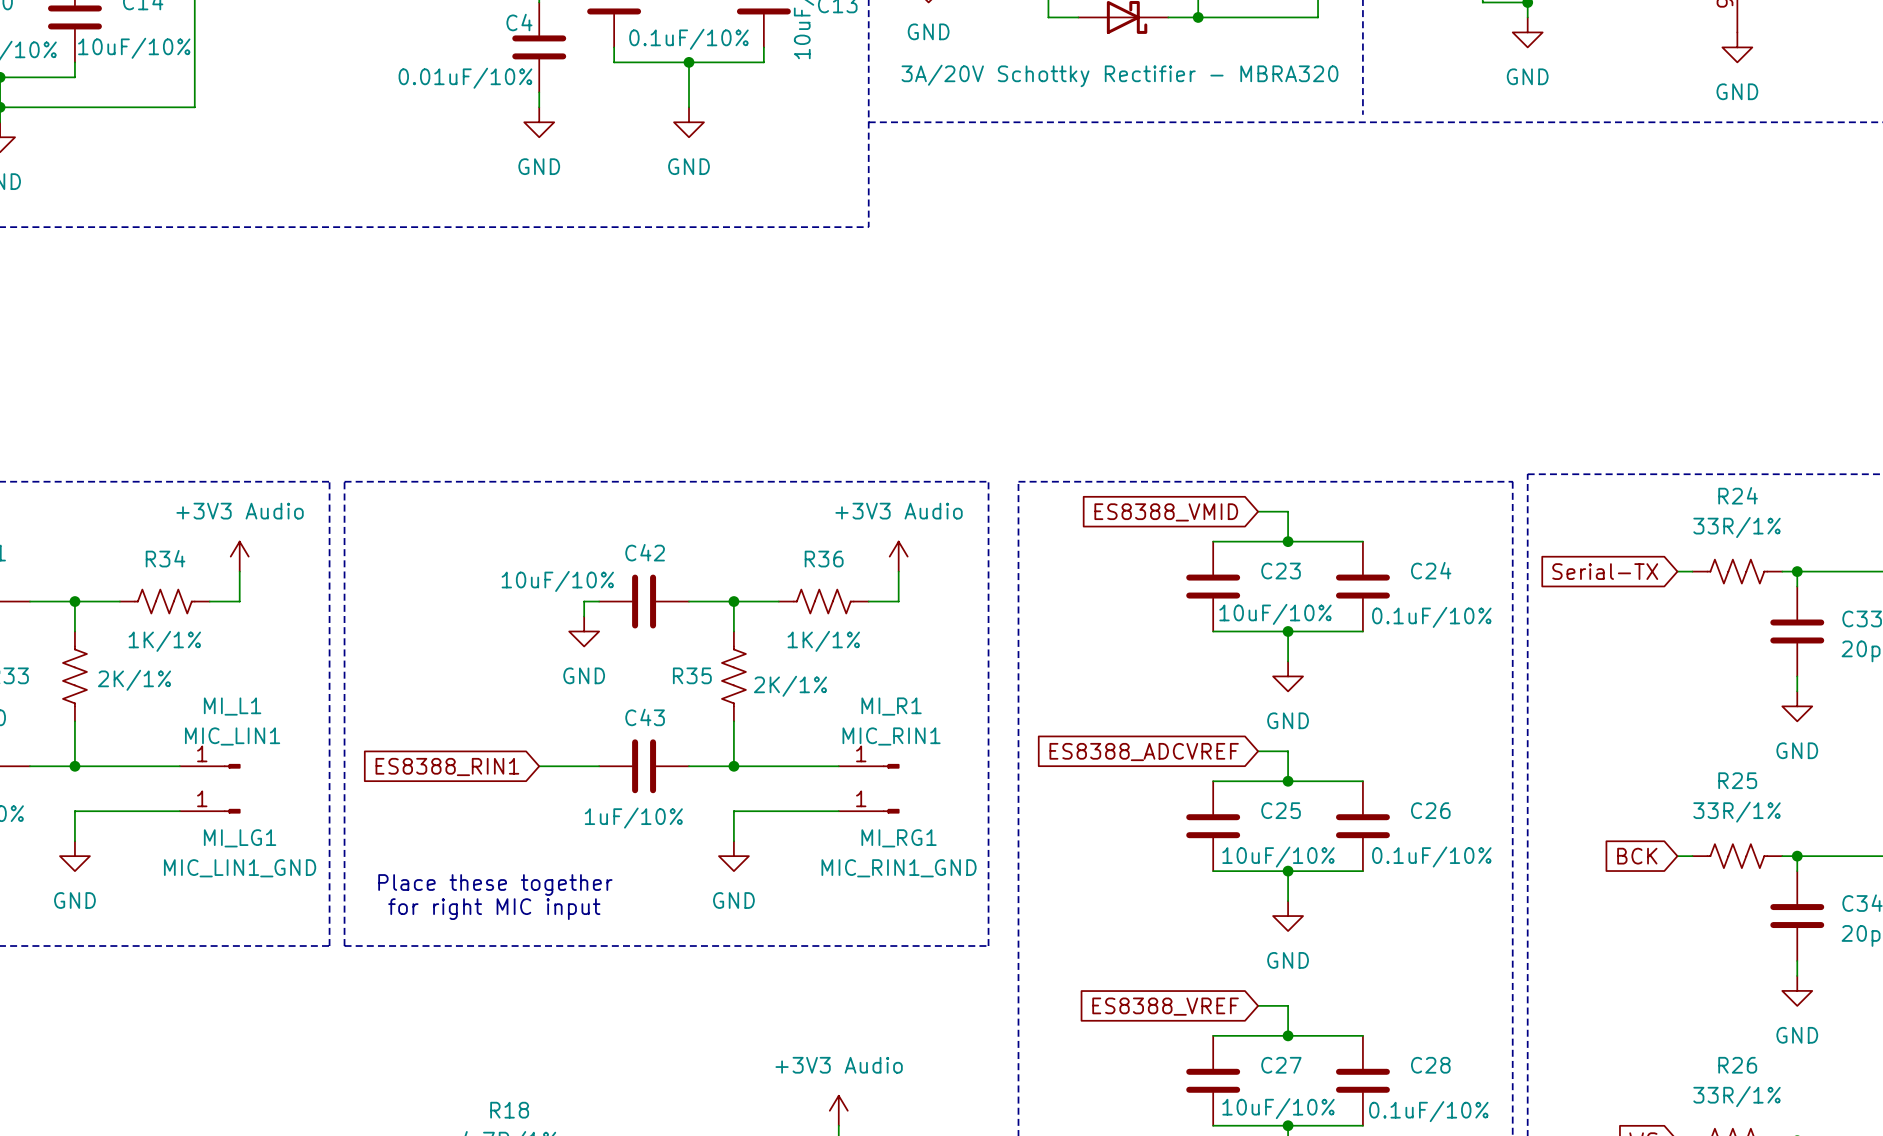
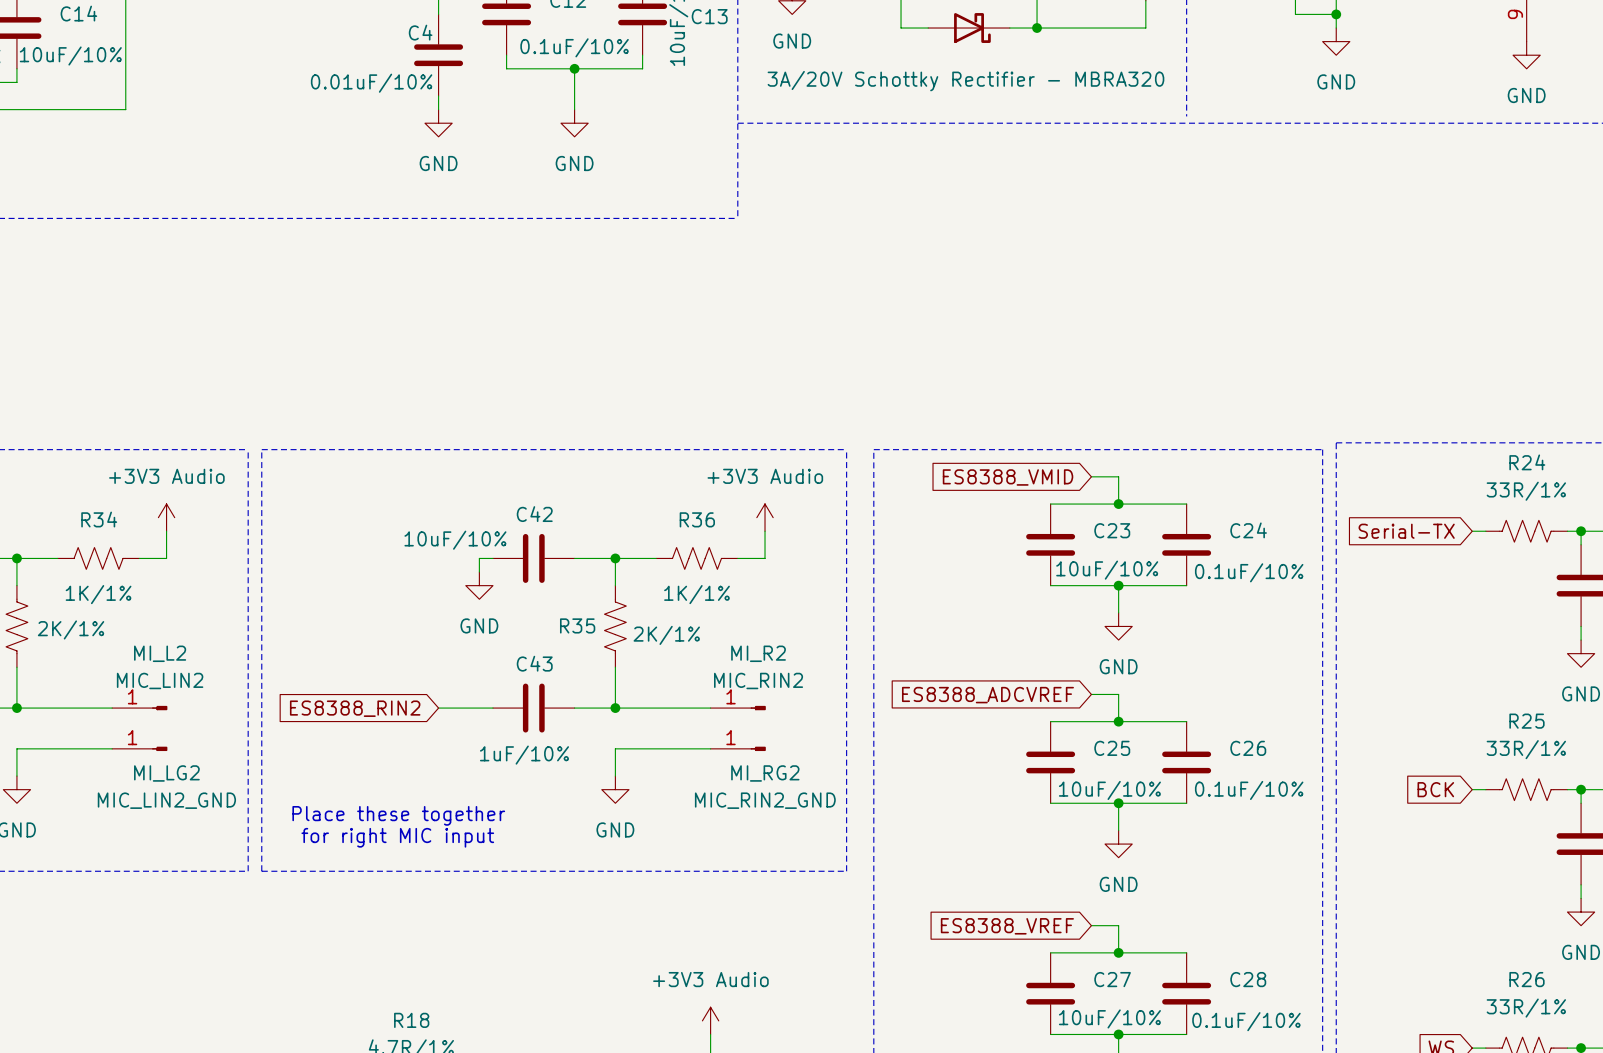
MI_L1 name: MI_L1 (232, 706) -> MI_L2 (160, 653)
MI_R1 name: MI_R1 (891, 706) -> MI_R2 (758, 653)
MI_L1 value: MIC_LIN1 (232, 736) -> MIC_LIN2 (160, 680)
MI_R1 value: MIC_RIN1 (891, 736) -> MIC_RIN2 (758, 680)
global label: ES8388_RIN1 (447, 766) -> ES8388_RIN2 (355, 708)
MI_LG1 name: MI_LG1 (240, 838) -> MI_LG2 (166, 773)
MI_RG1 name: MI_RG1 (899, 838) -> MI_RG2 (765, 773)
MI_LG1 value: MIC_LIN1_GND (240, 868) -> MIC_LIN2_GND (166, 800)
MI_RG1 value: MIC_RIN1_GND (899, 868) -> MIC_RIN2_GND (765, 800)

